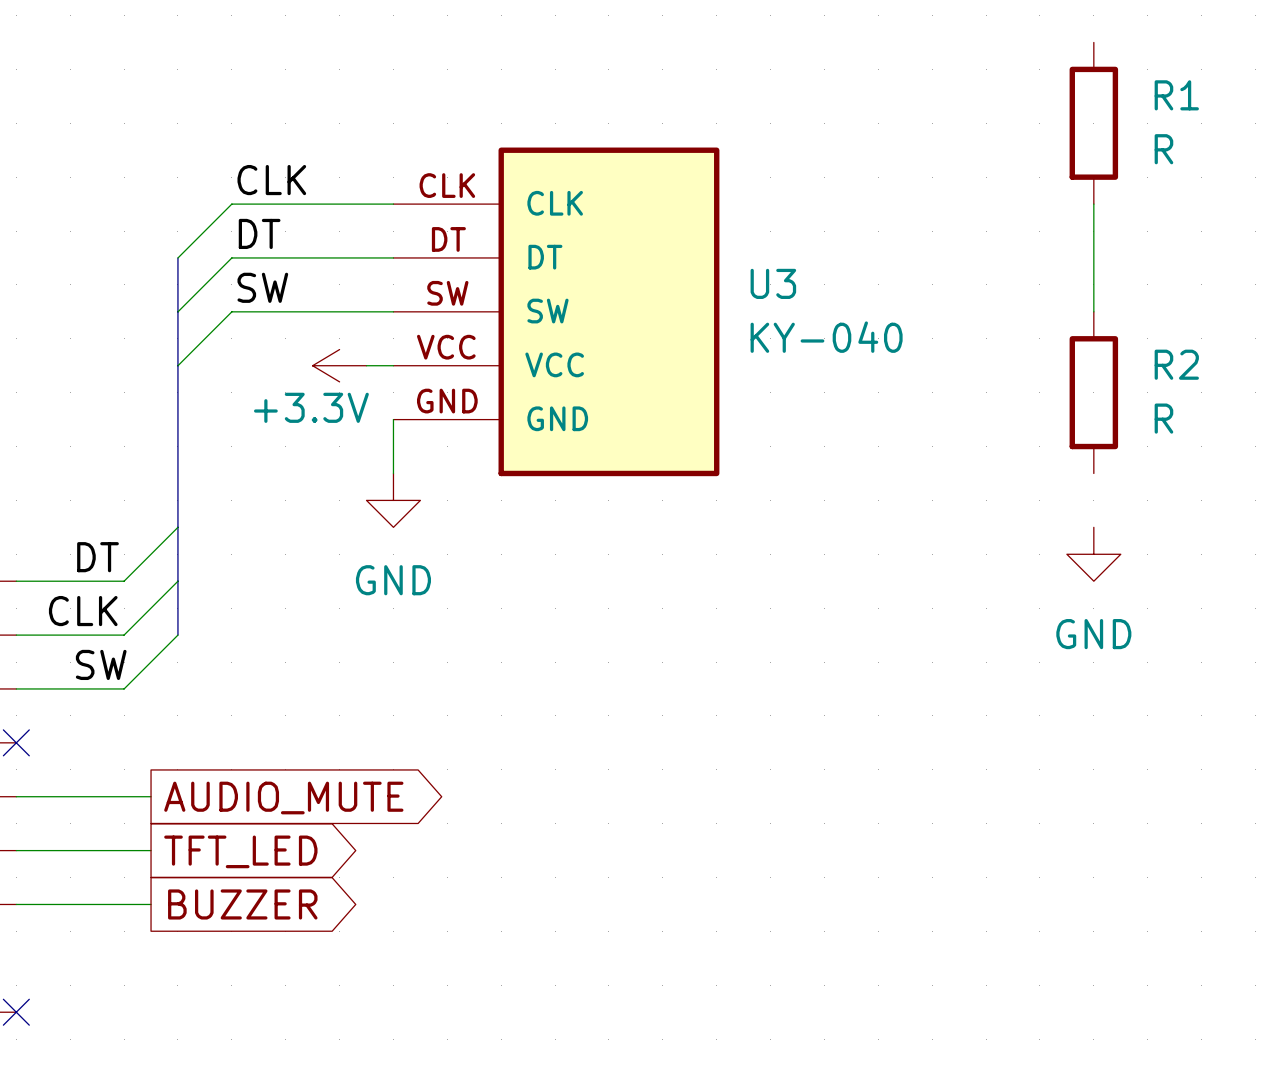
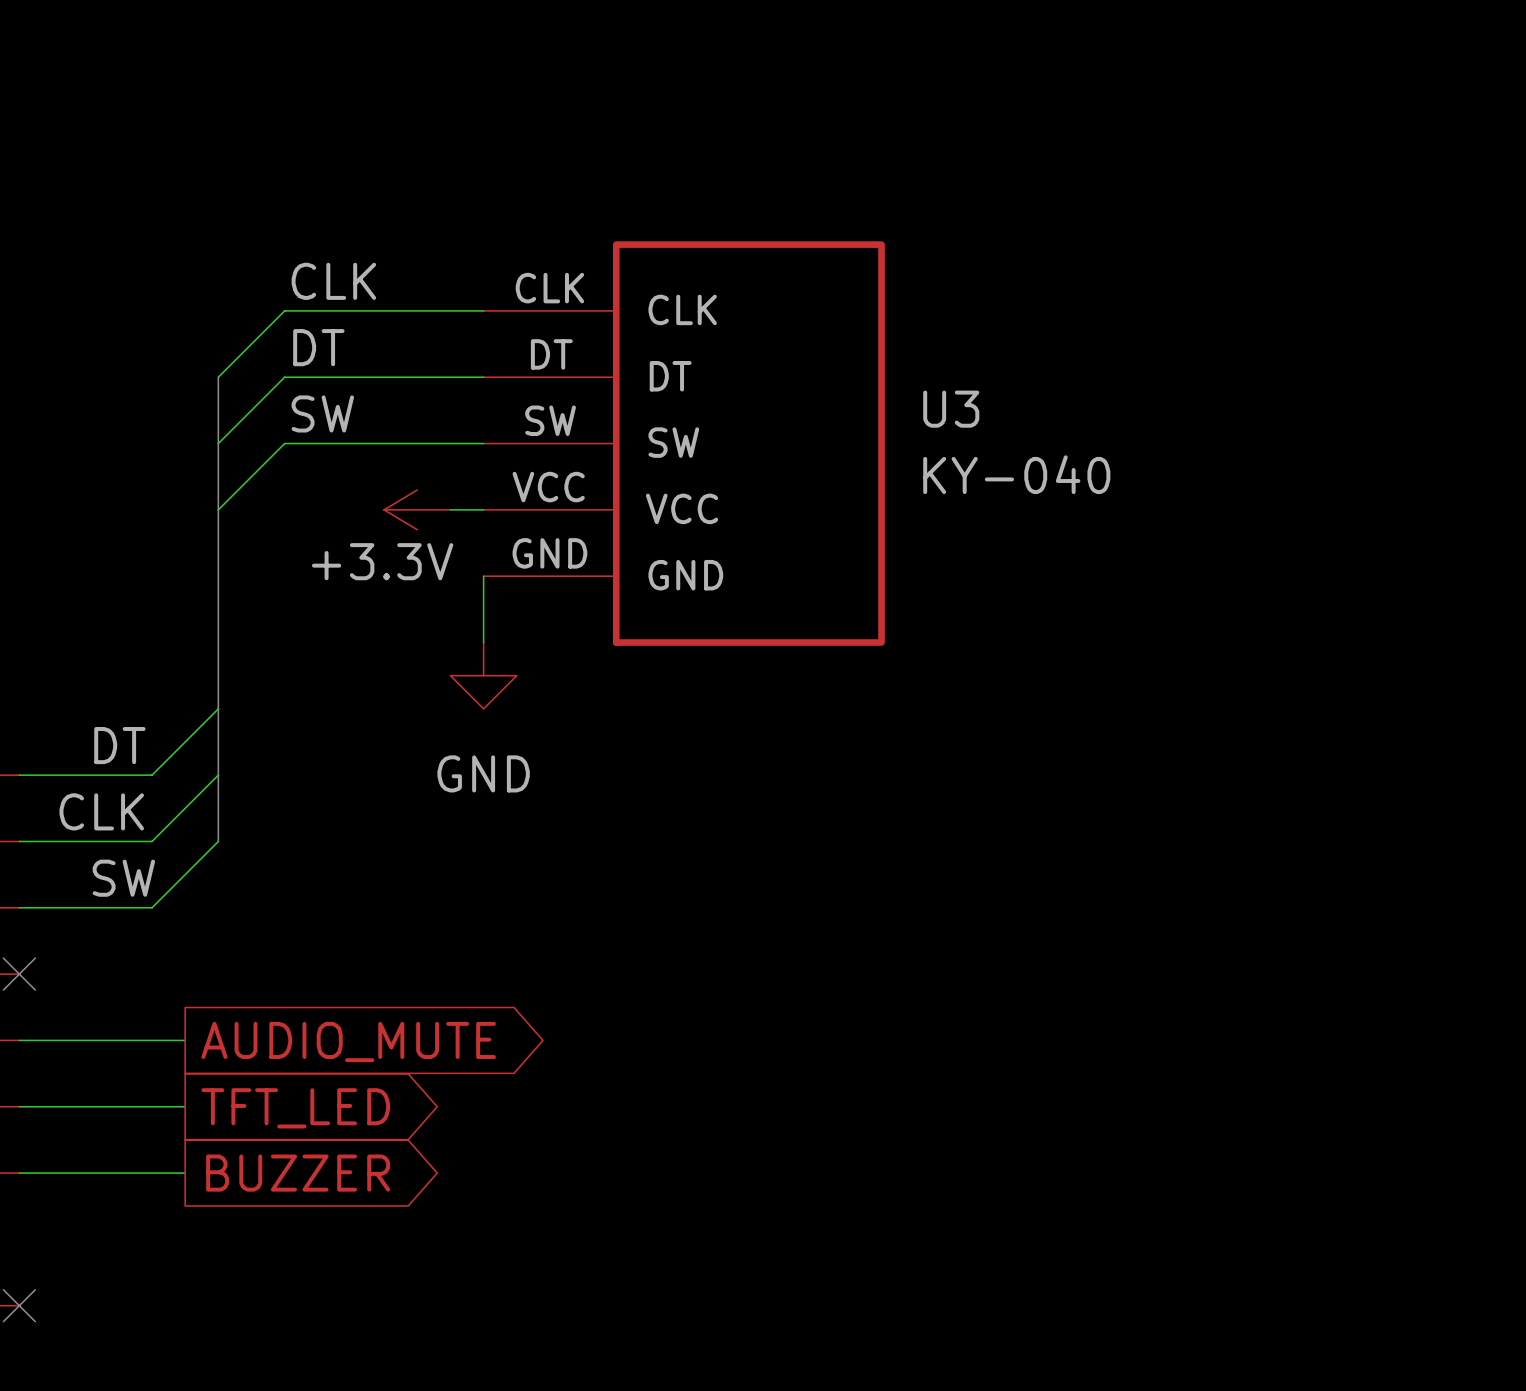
R1: R (1093, 123) -> none
wire: (1093, 204) (1093, 311) -> none
R2: R (1093, 392) -> none
power symbol: GND (1093, 554) -> none

